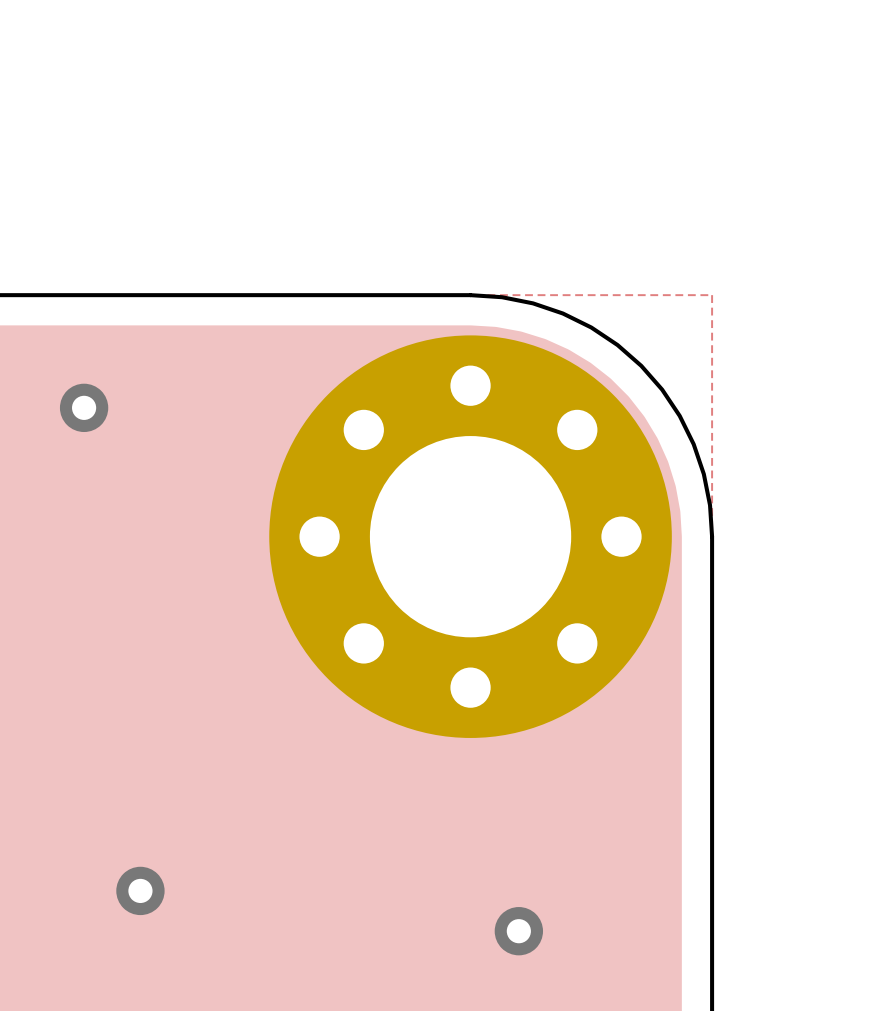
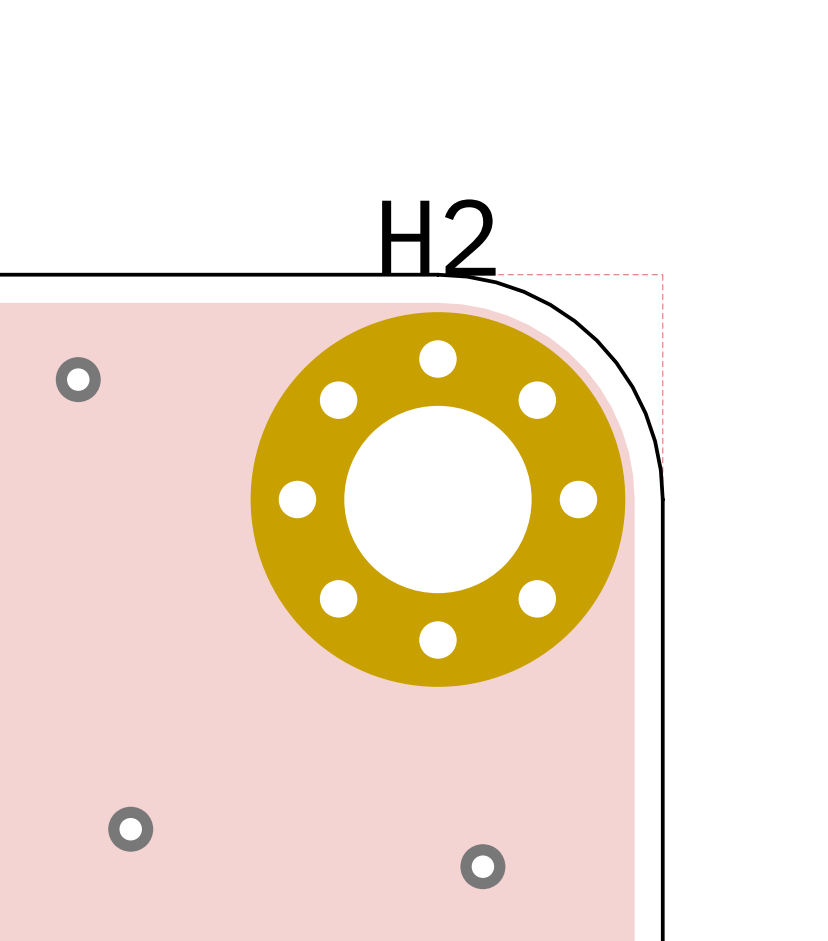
H2 name: none -> H2 (438, 237)

